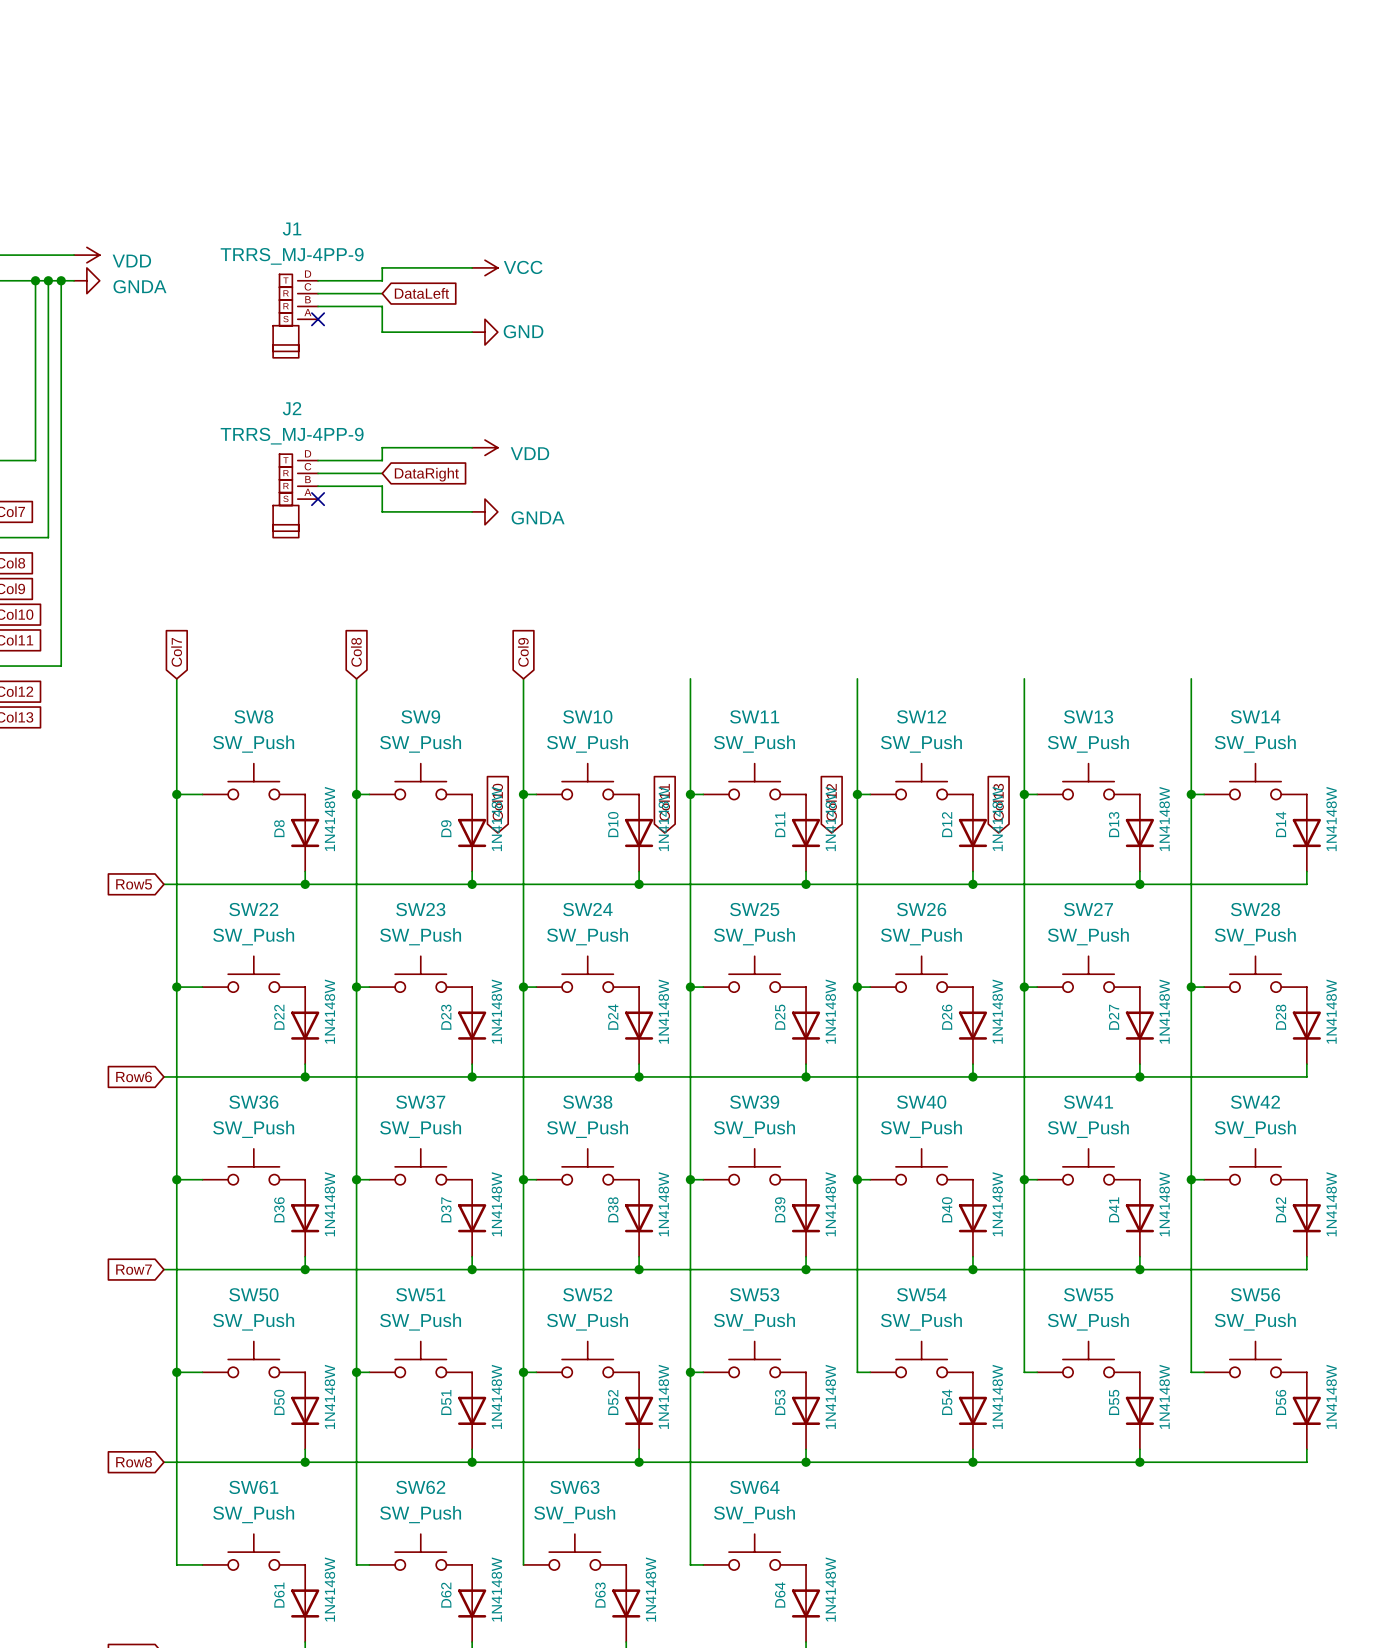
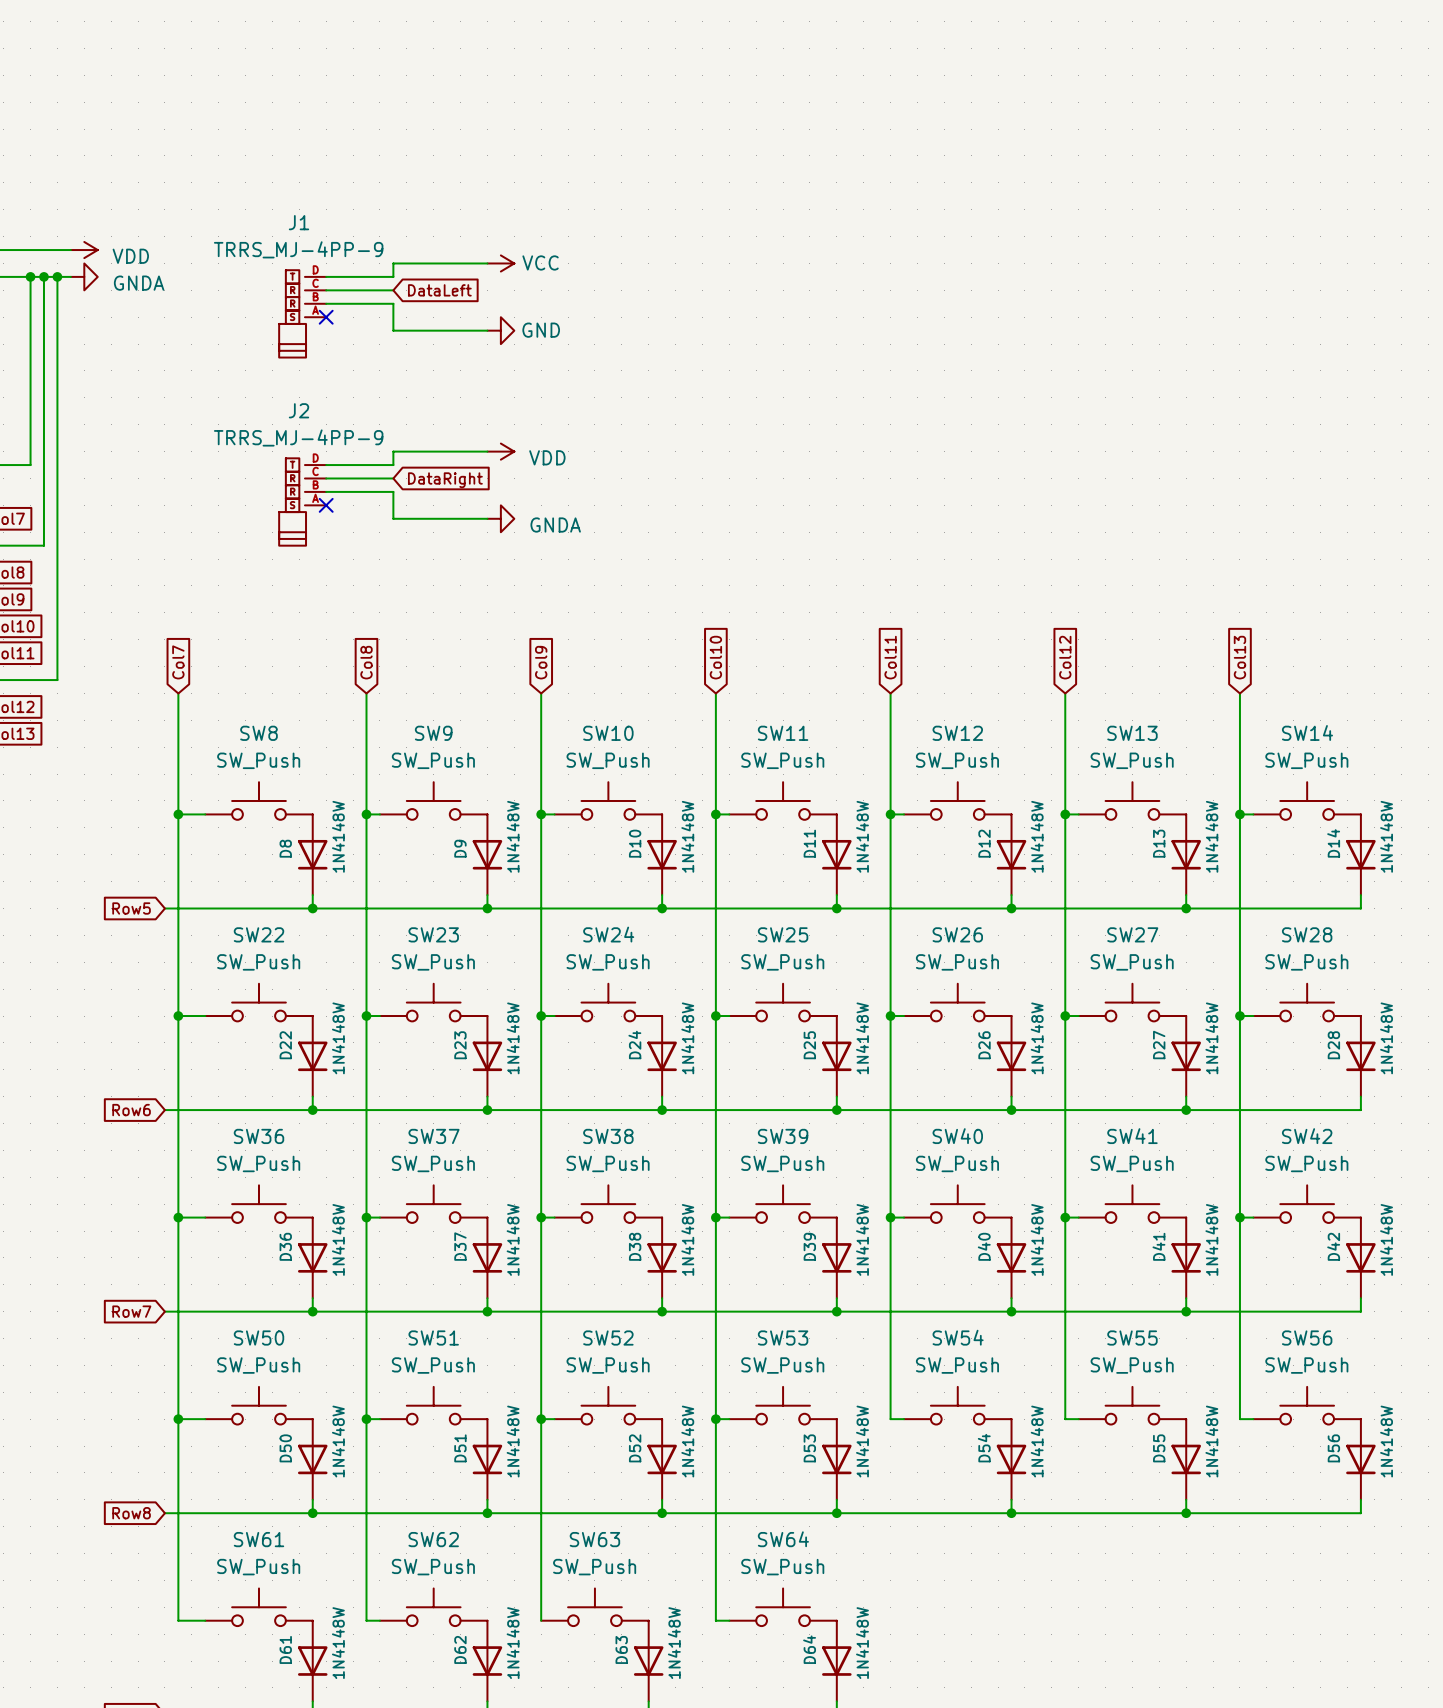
global label position: Col10 (497, 802) -> Col10 (715, 657)
global label position: Col11 (664, 802) -> Col11 (890, 657)
global label position: Col12 (831, 802) -> Col12 (1065, 657)
global label position: Col13 (998, 802) -> Col13 (1239, 657)

